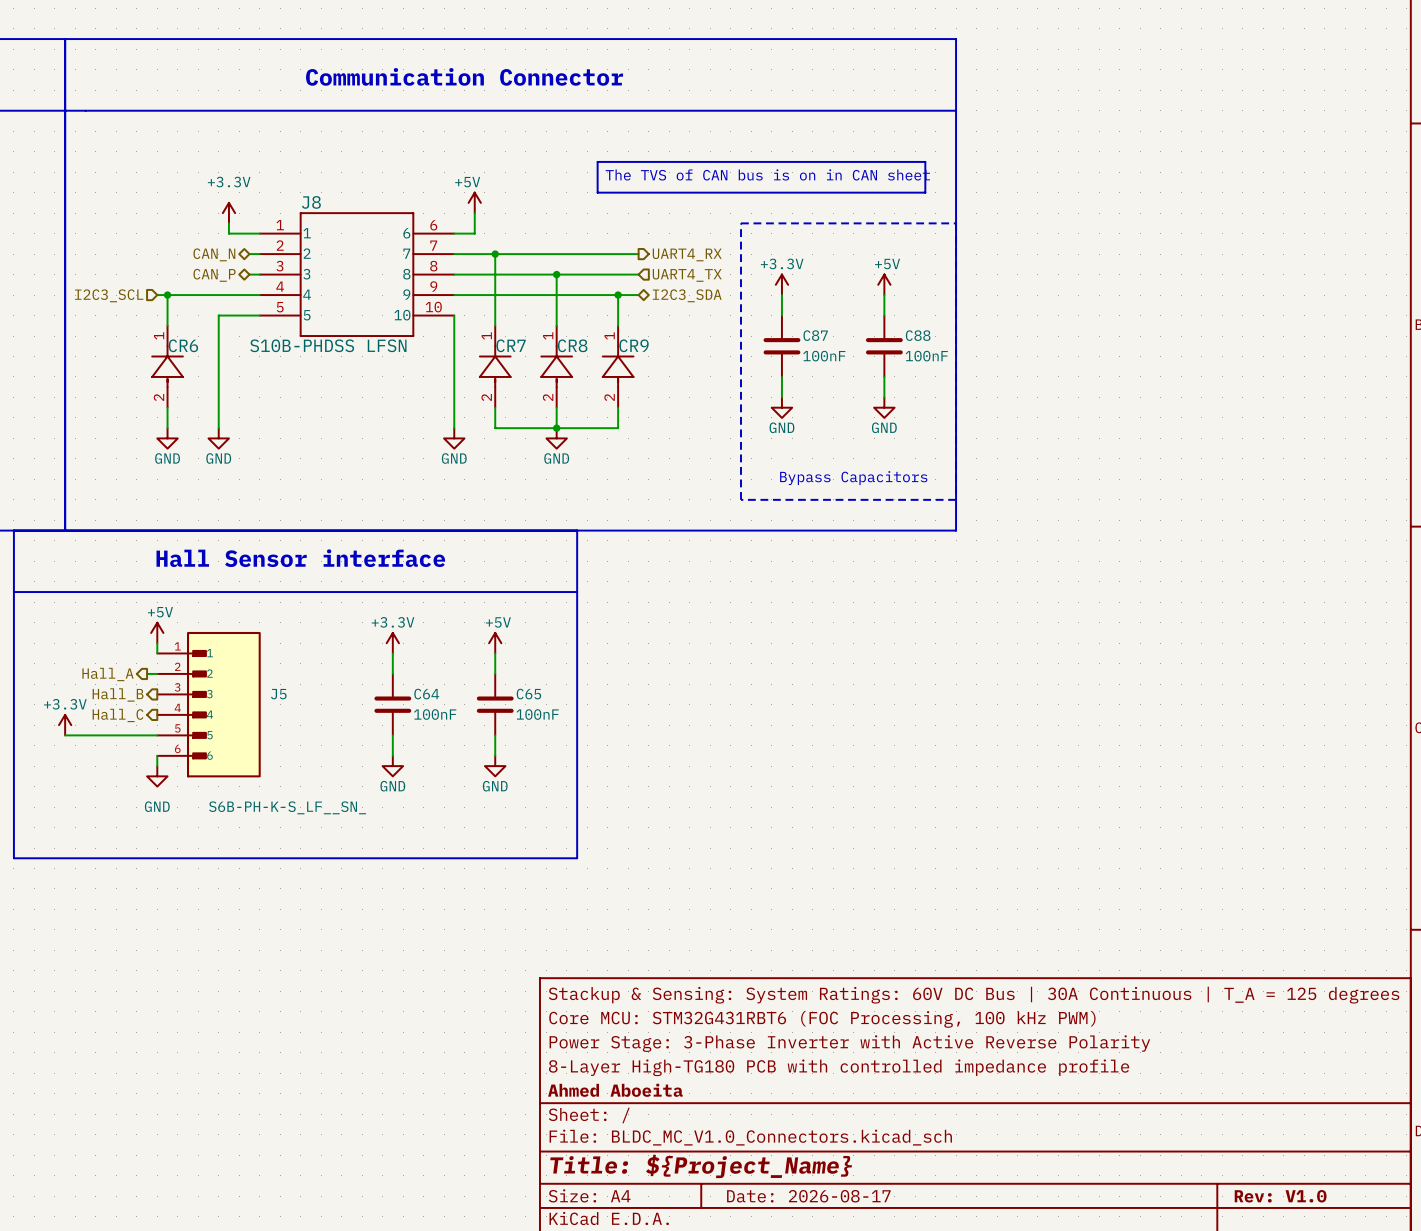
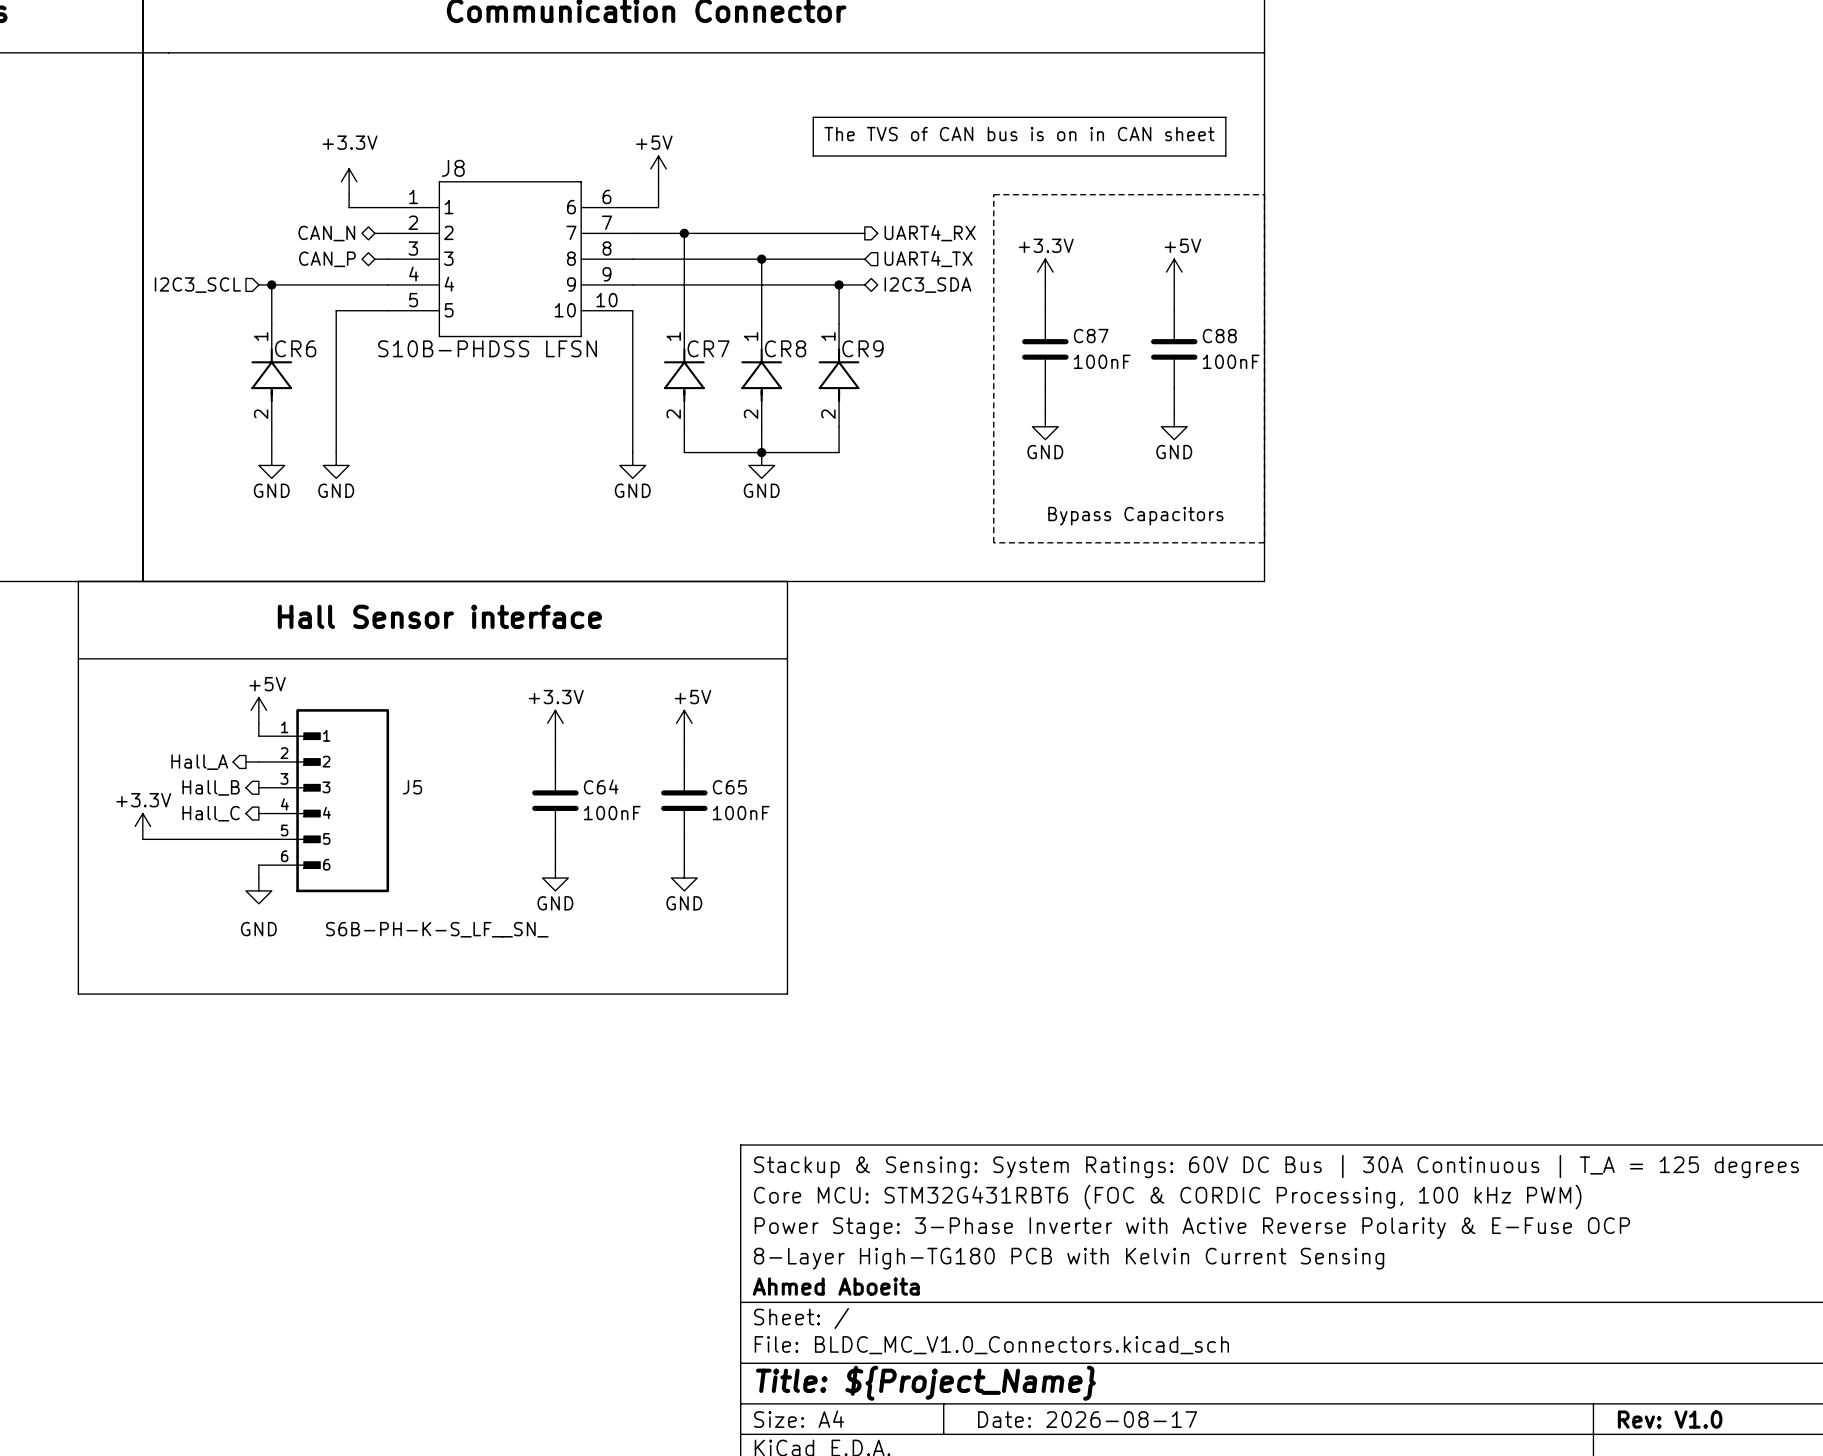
title block: Core MCU: STM32G431RBT6 (FOC Processing, 100 kHz PWM) (822, 1019) -> Core MCU: STM32G431RBT6 (FOC & CORDIC Processing, 100 kHz PWM) (1167, 1197)
title block: Power Stage: 3-Phase Inverter with Active Reverse Polarity (849, 1043) -> Power Stage: 3-Phase Inverter with Active Reverse Polarity & E-Fuse OCP (1192, 1228)
title block: 8-Layer High-TG180 PCB with controlled impedance profile (839, 1067) -> 8-Layer High-TG180 PCB with Kelvin Current Sensing (1069, 1258)

